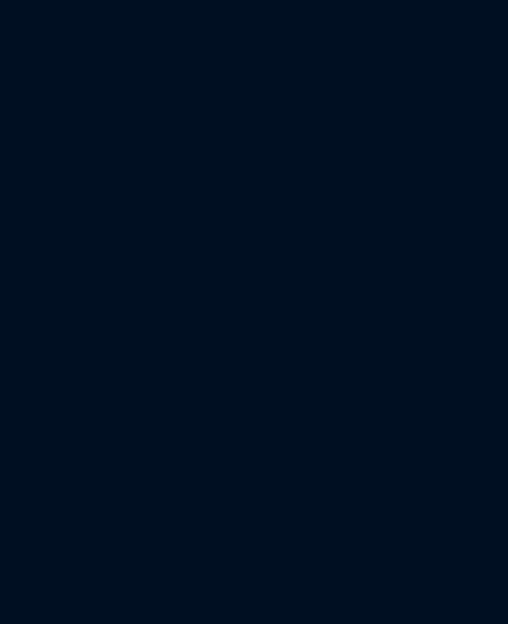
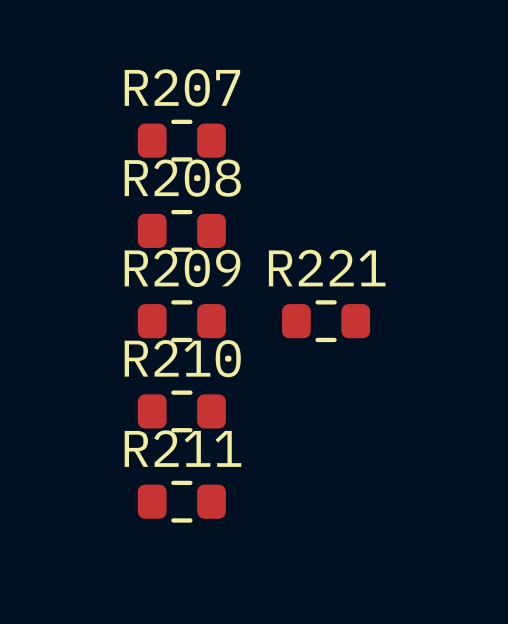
R207: none -> (181, 140)
R208: none -> (181, 230)
R209: none -> (181, 321)
R221: none -> (326, 321)
R210: none -> (181, 411)
R211: none -> (181, 501)

